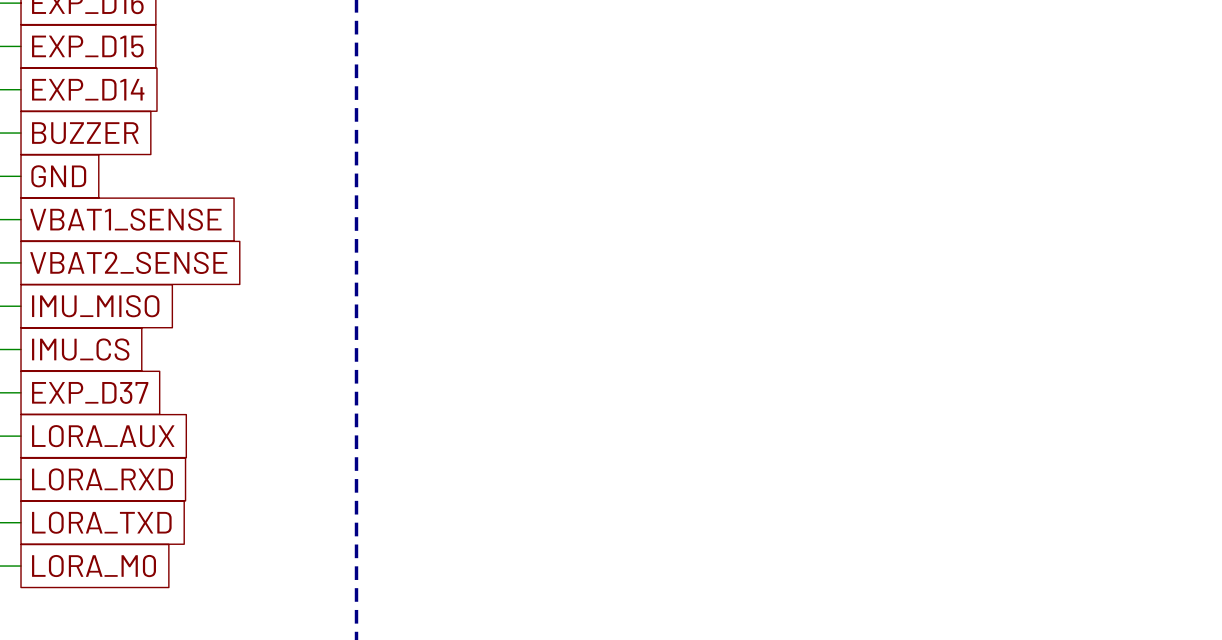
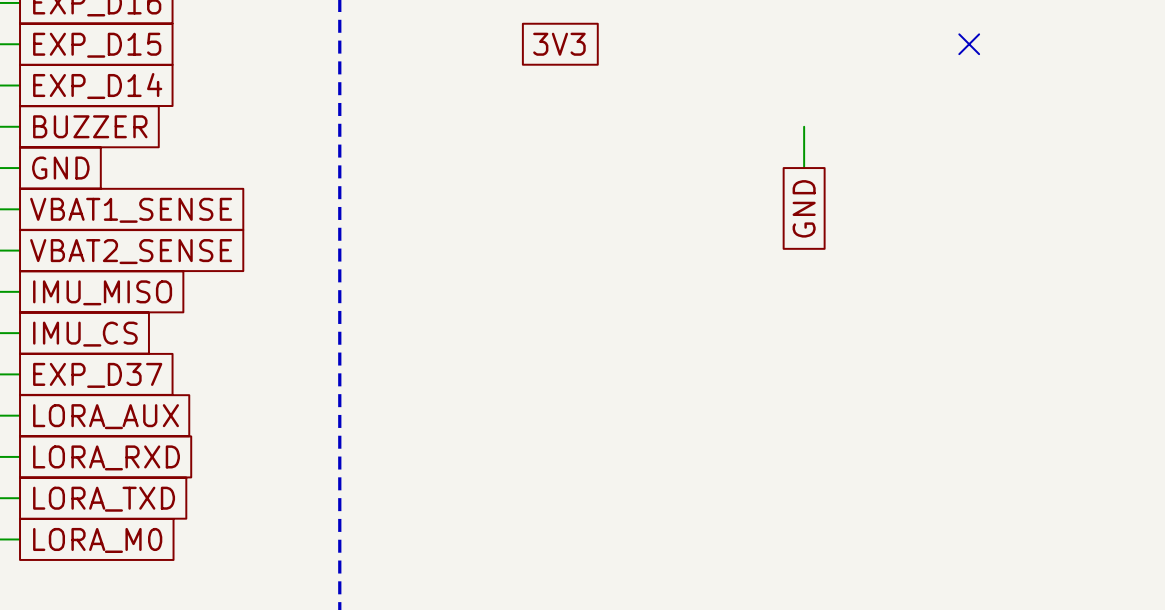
global label: none -> 3V3 (559, 44)
no-connect mark: none -> (969, 44)
wire: none -> (804, 126) (804, 168)
global label: none -> GND (804, 208)

